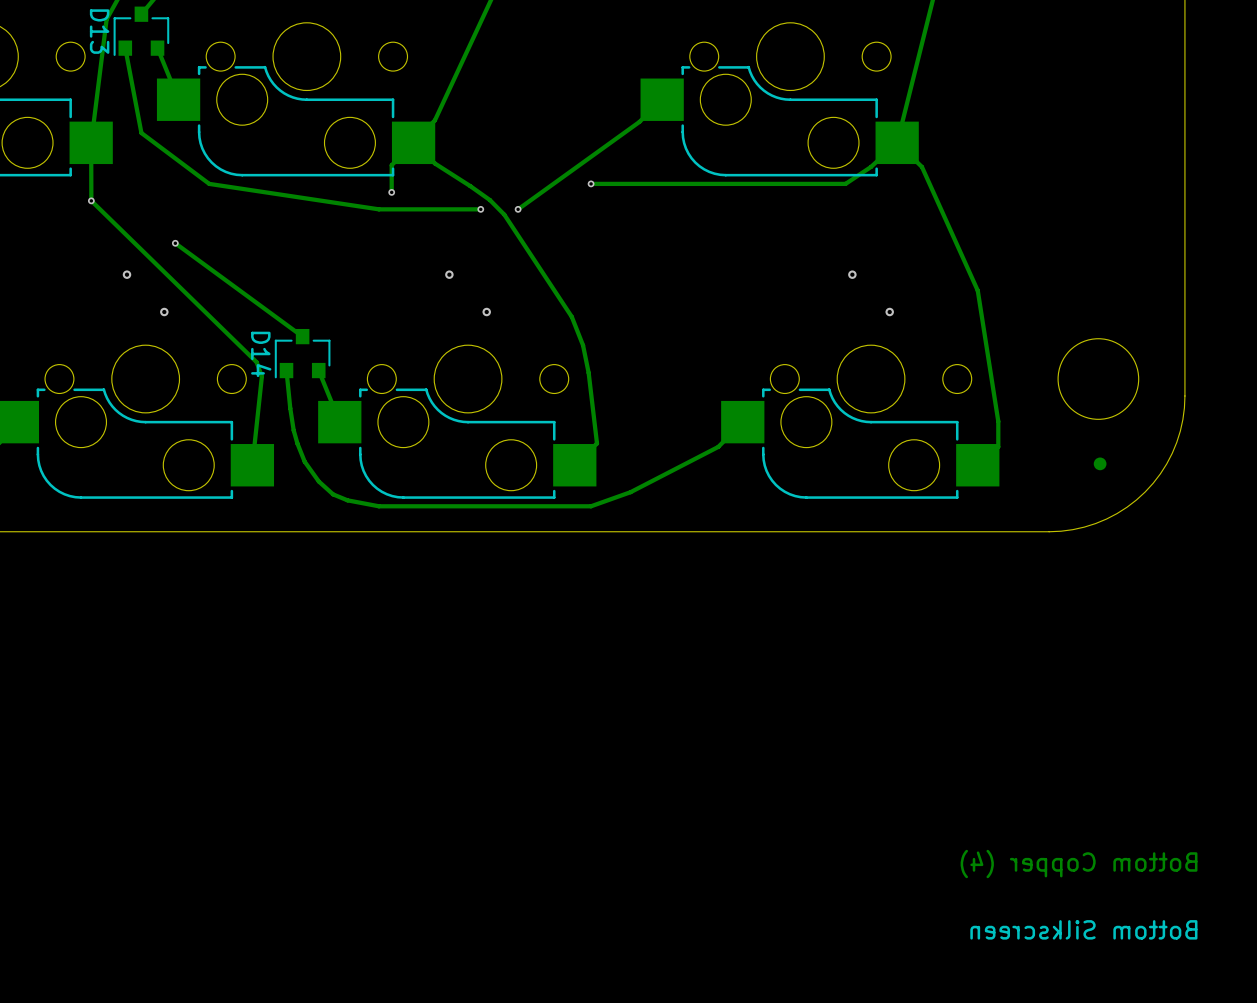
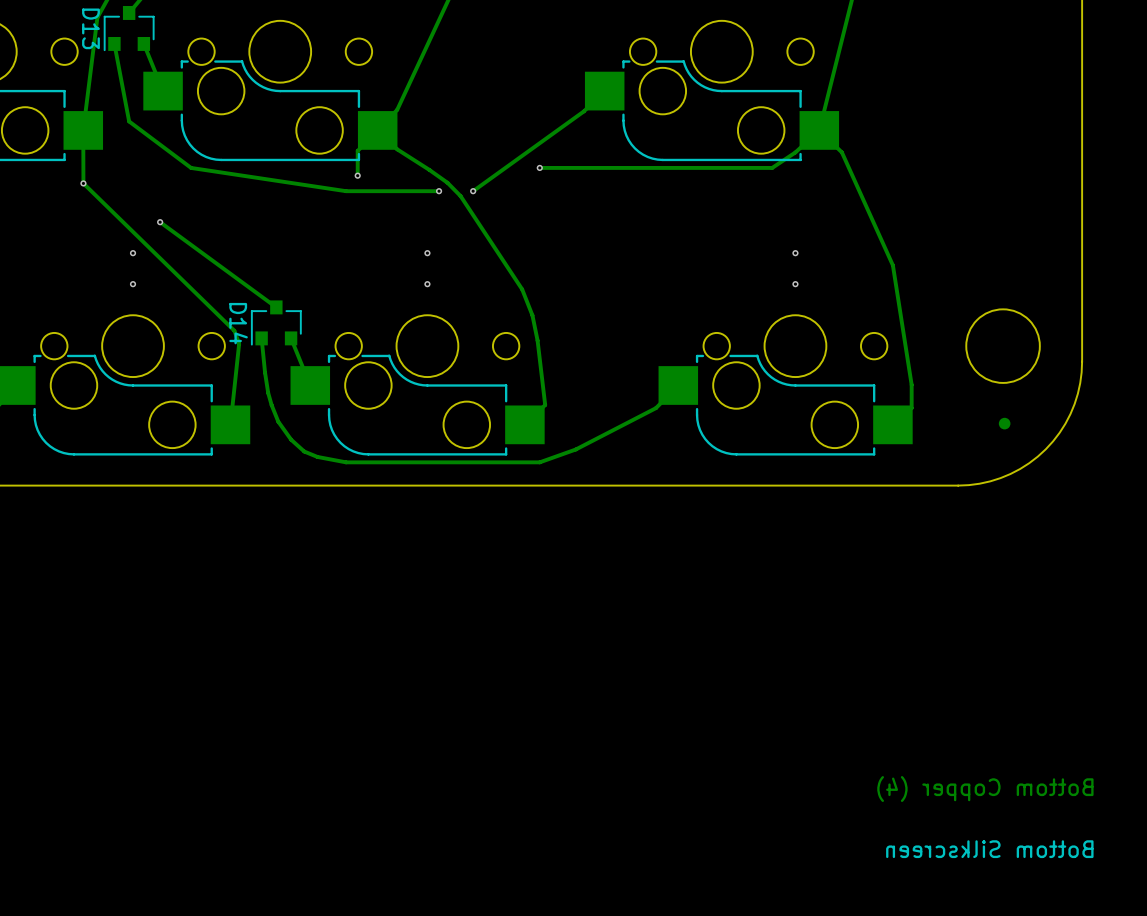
via: (126, 274) -> none
via: (449, 274) -> none
via: (852, 274) -> none
via: none -> (133, 253)
via: none -> (427, 253)
via: none -> (795, 253)
via: none -> (133, 284)
via: none -> (427, 284)
via: none -> (795, 284)
via: (164, 312) -> none
via: (486, 312) -> none
via: (889, 312) -> none

